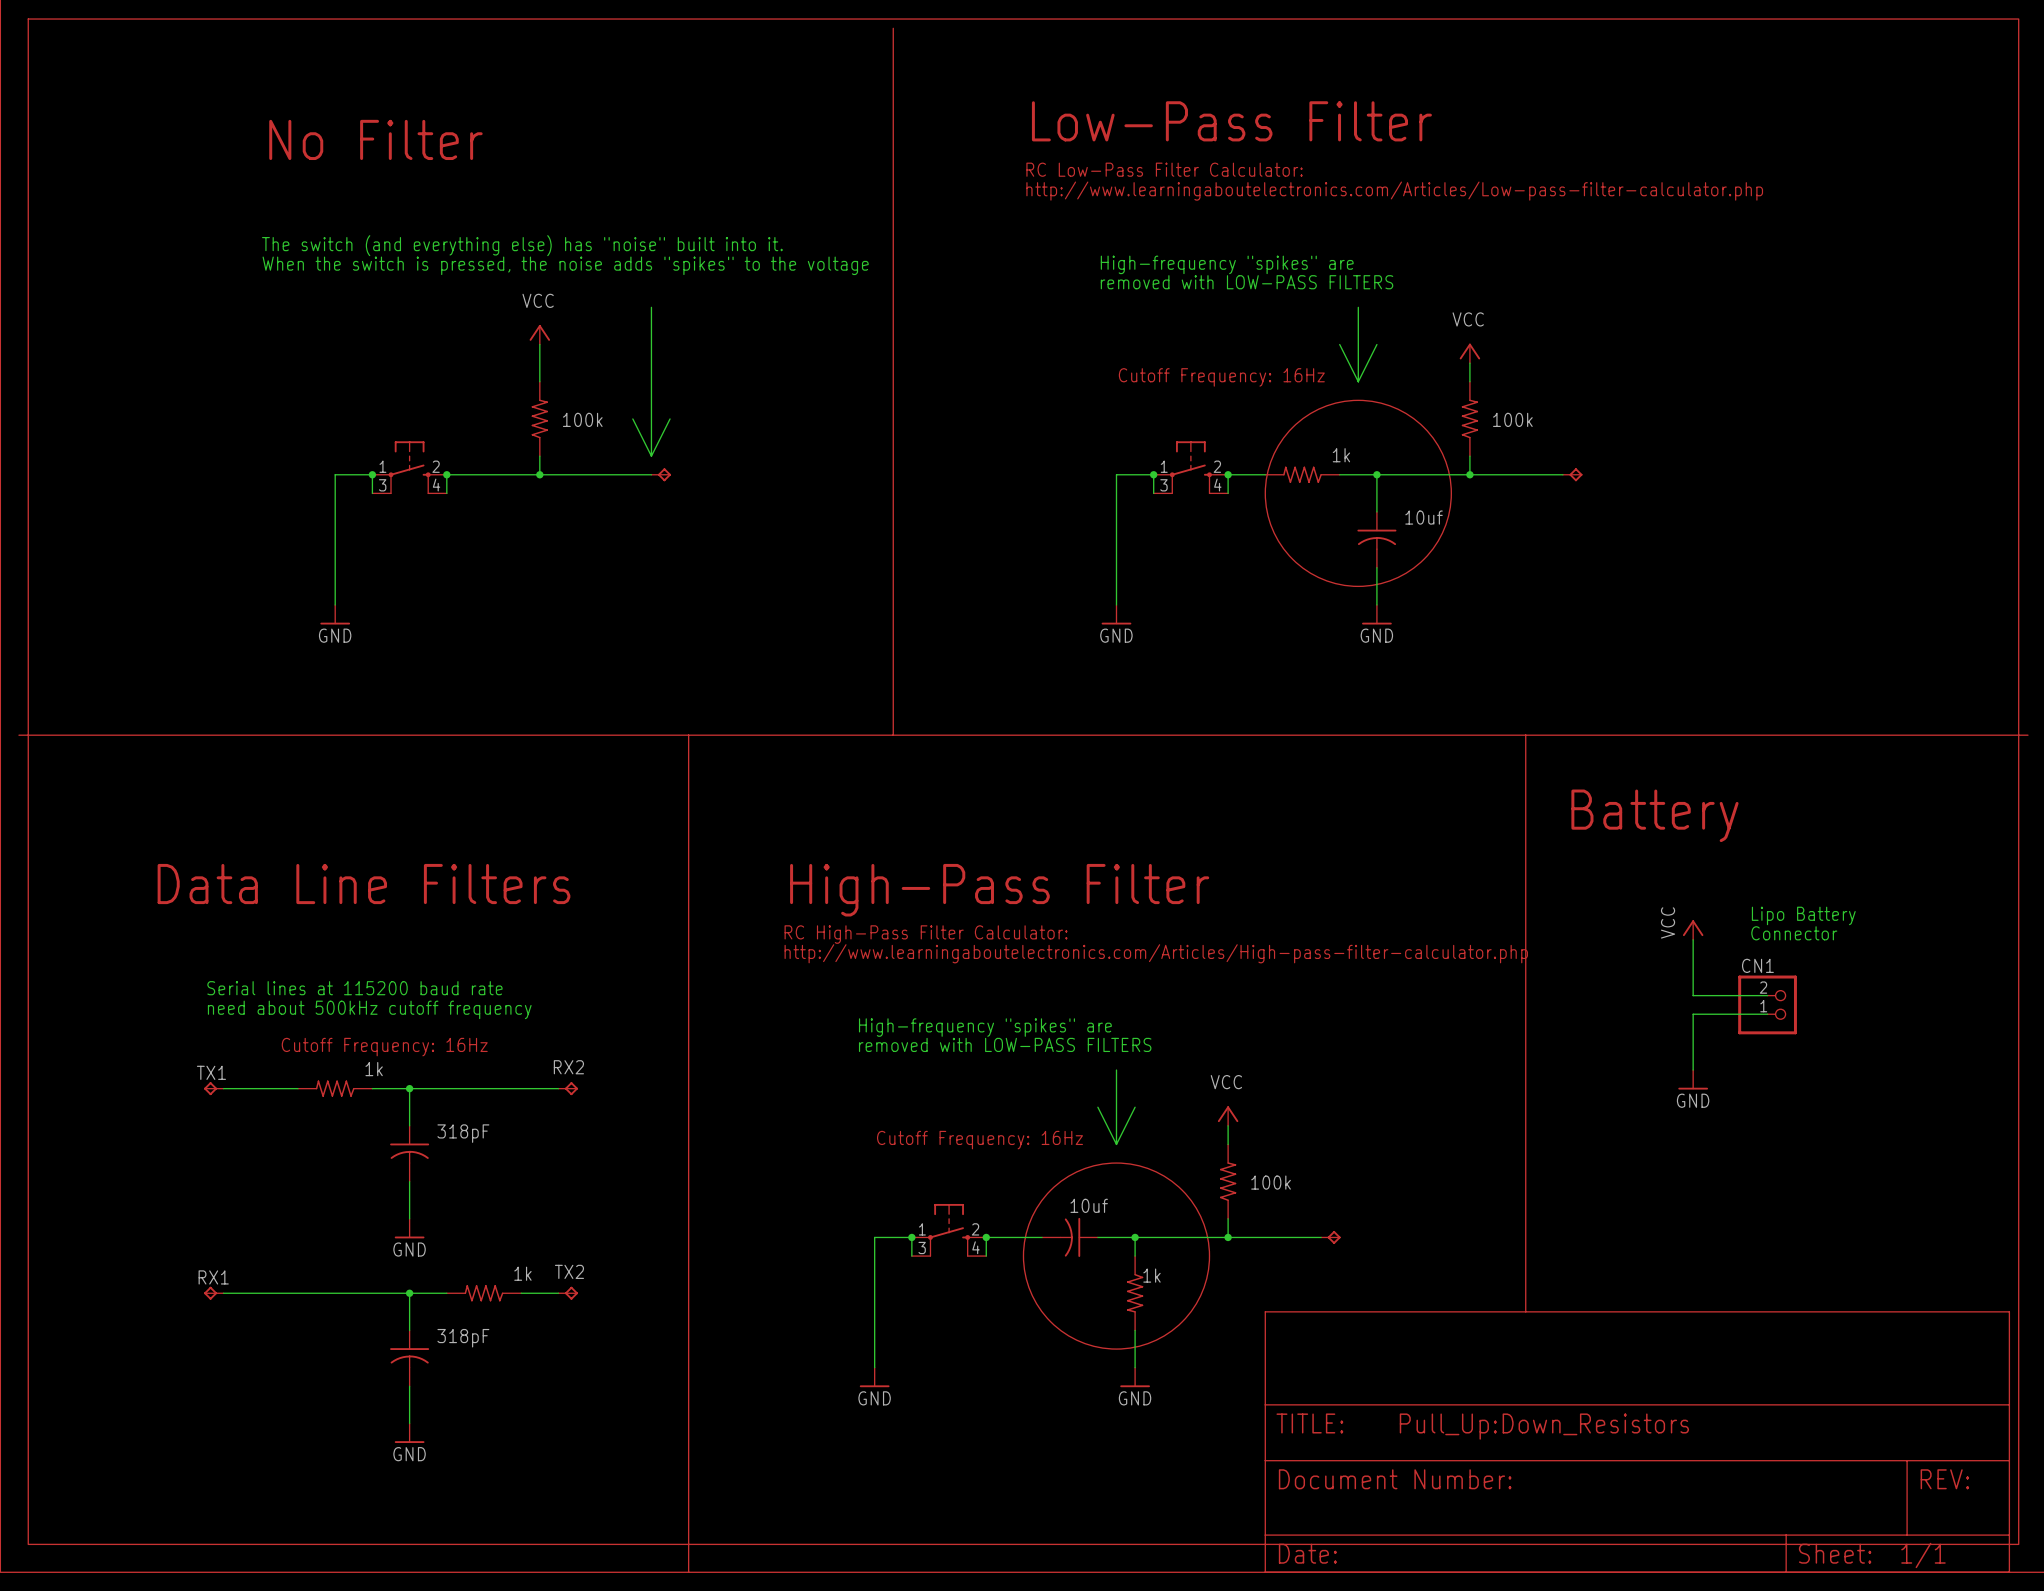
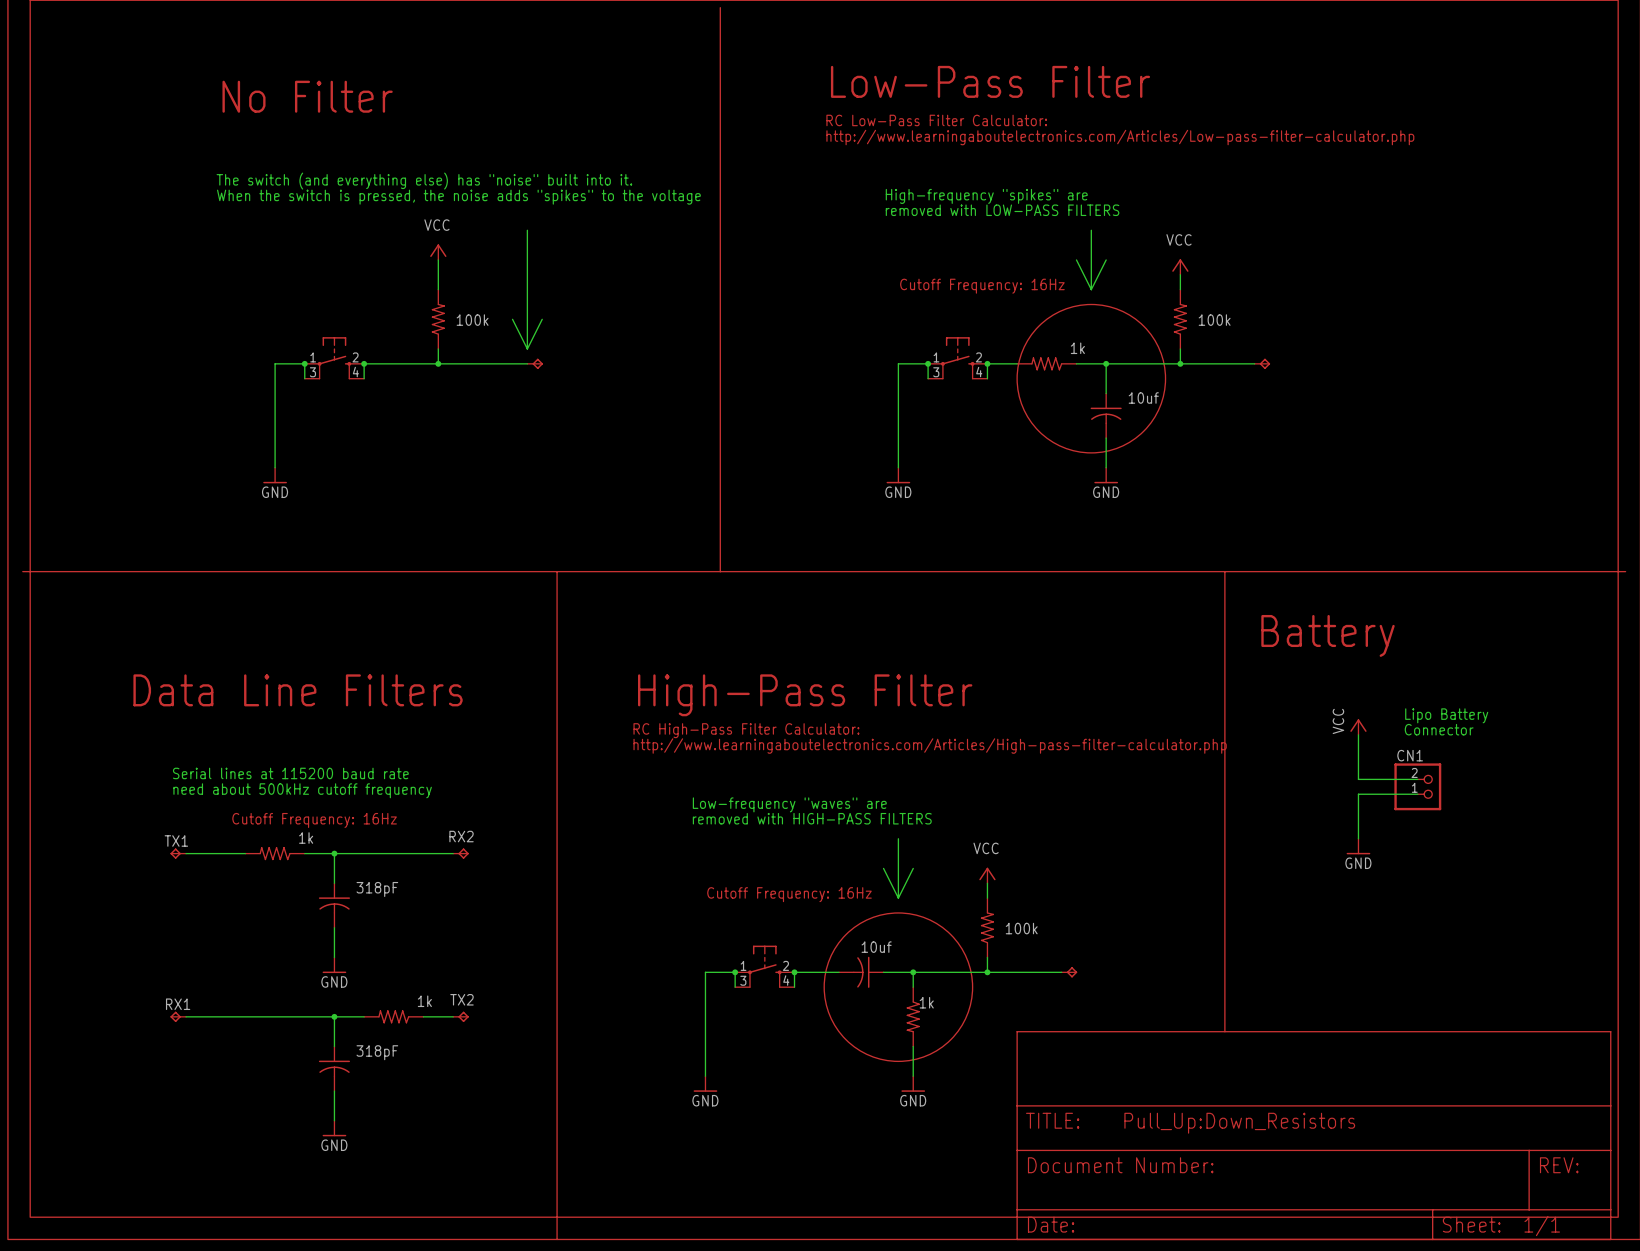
text: High-frequency "spikes" are (985, 1027) -> Low-frequency "waves" are (789, 804)
text: removed with LOW-PASS FILTERS (1005, 1044) -> removed with HIGH-PASS FILTERS (812, 818)

